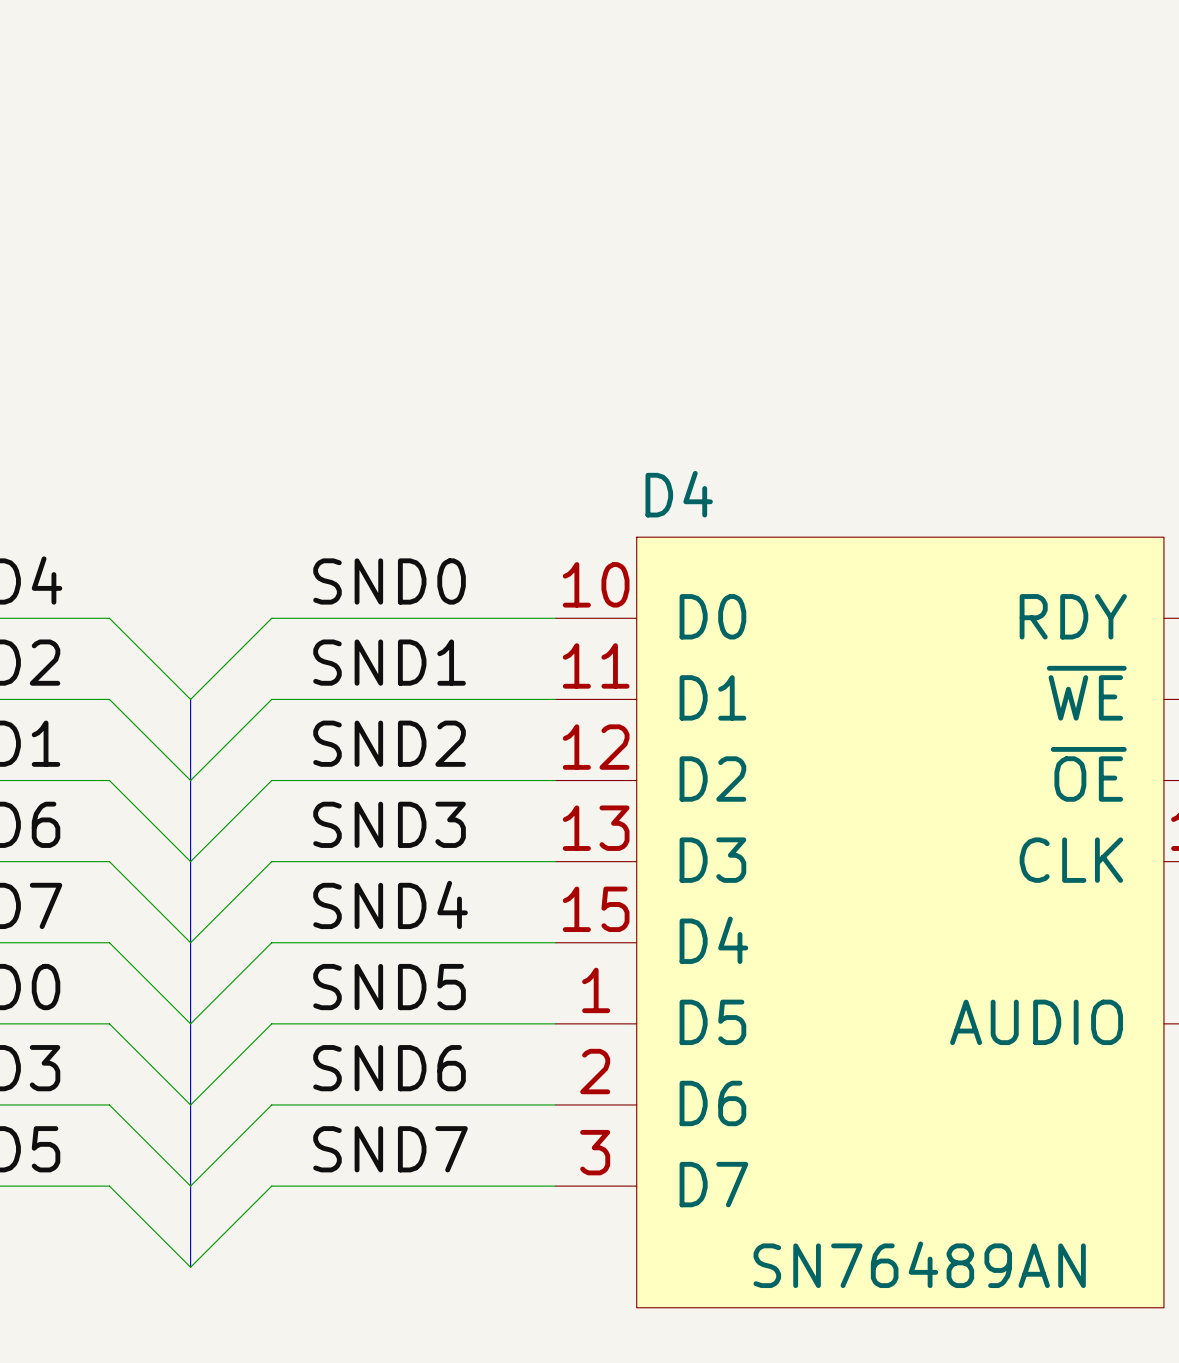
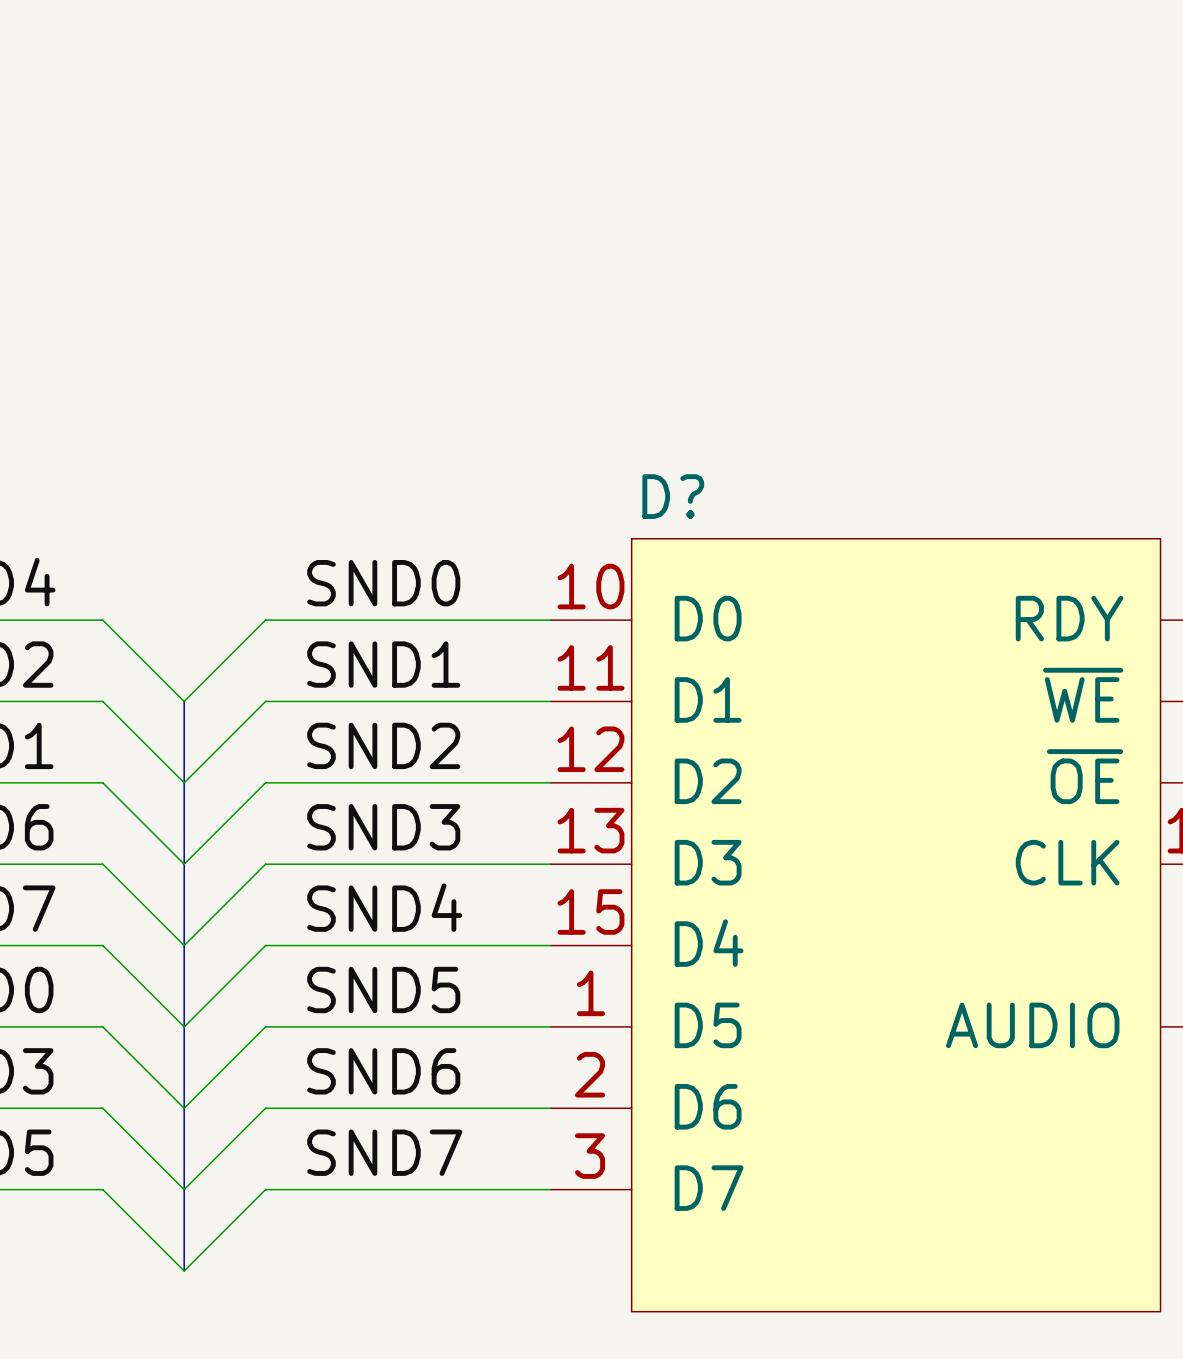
D4 name: D4 (679, 494) -> D? (673, 496)
D4 value: SN76489AN (919, 1264) -> none

